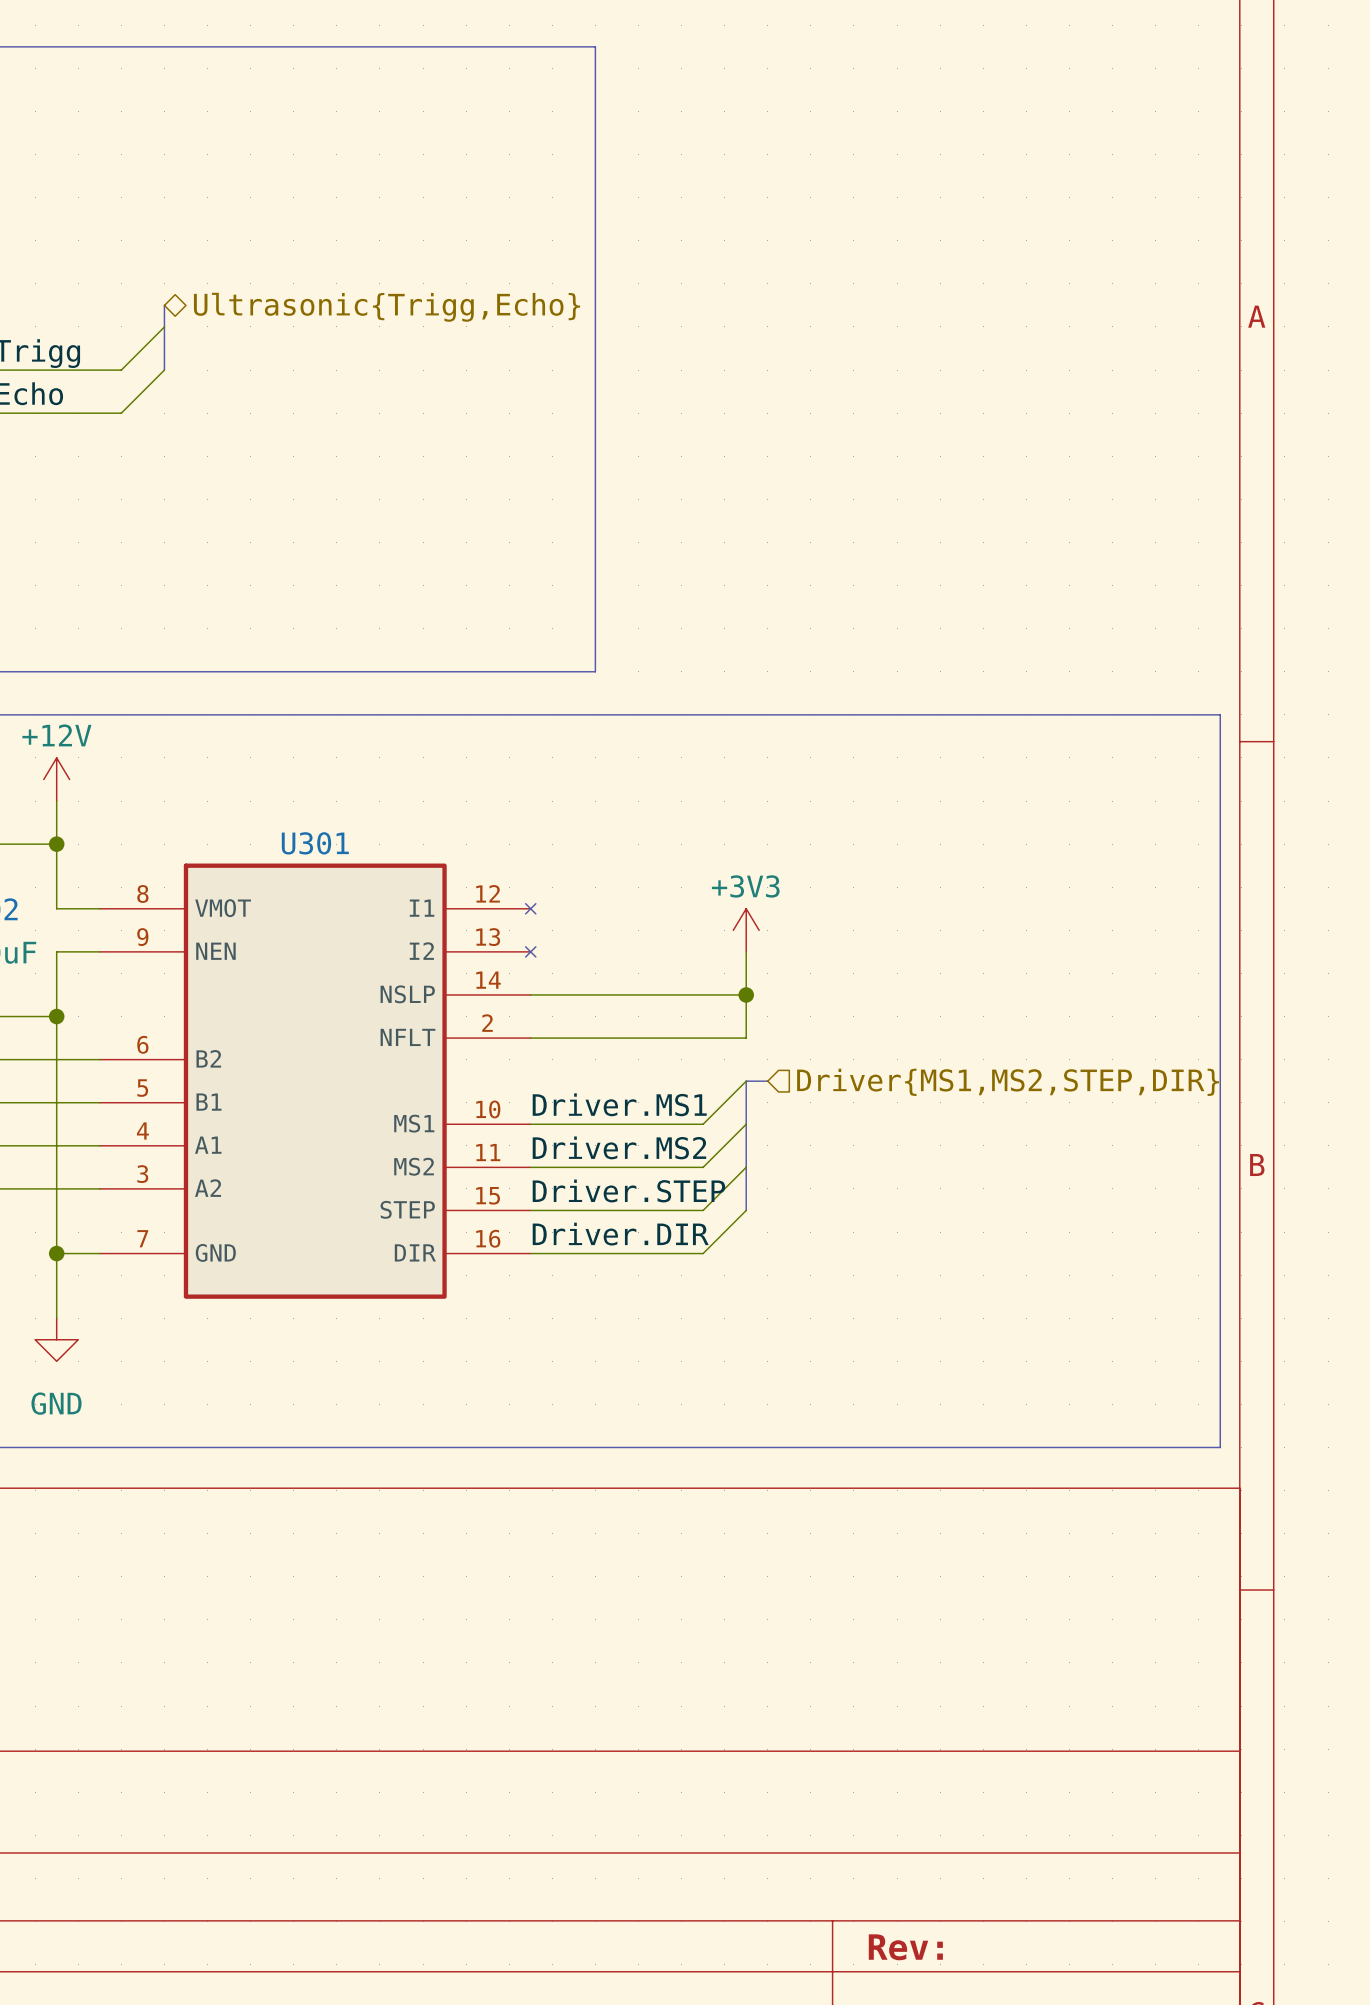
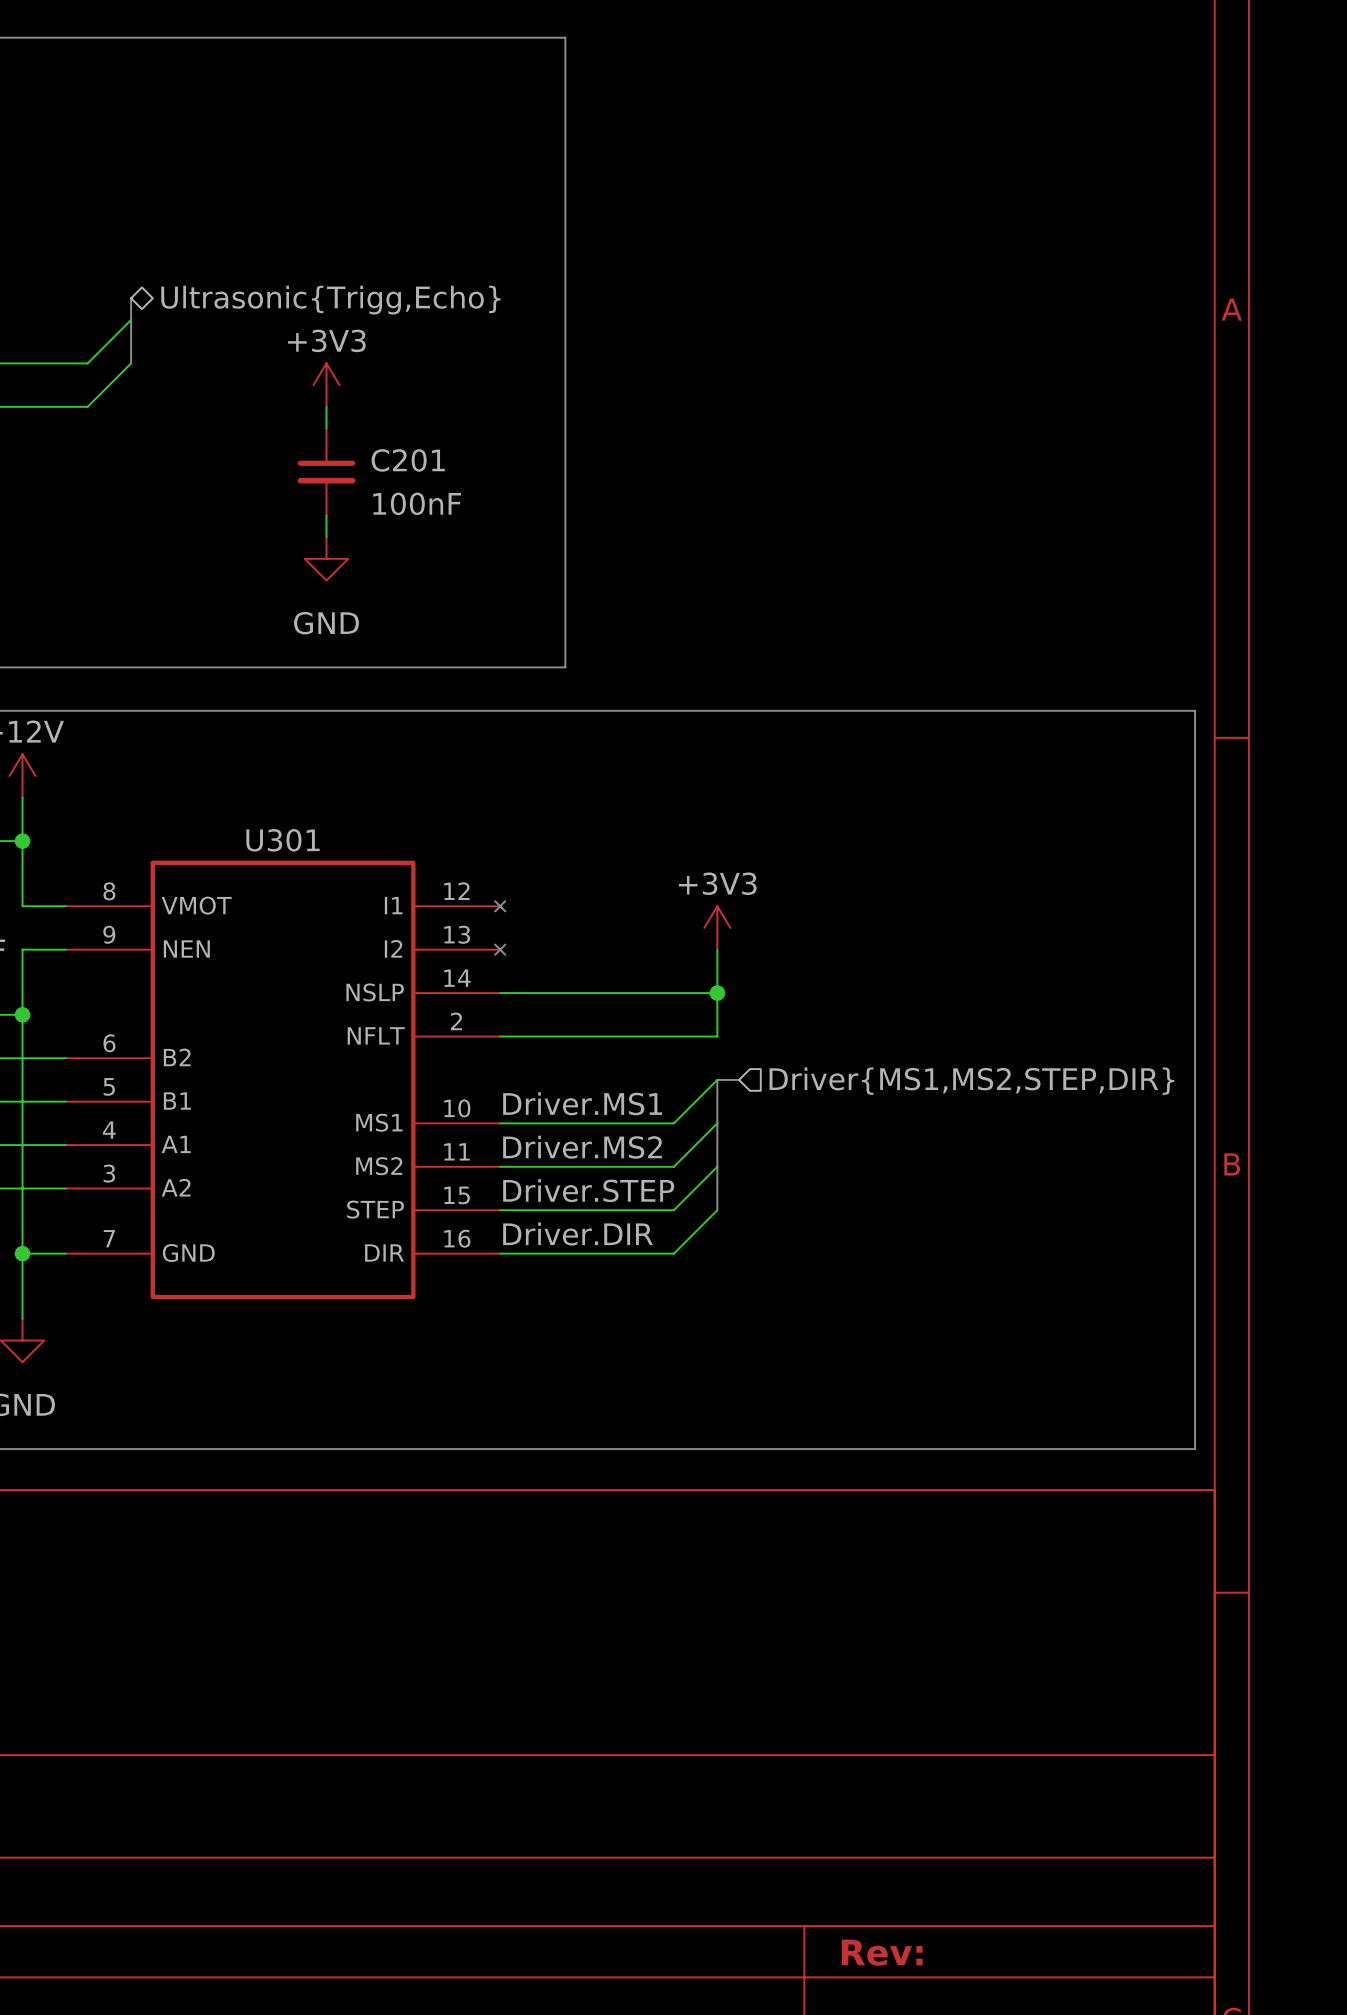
power symbol: none -> +3V3 (326, 385)
wire: none -> (326, 406) (326, 428)
C201: none -> 100nF (326, 471)
wire: none -> (326, 515) (326, 537)
power symbol: none -> GND (326, 558)

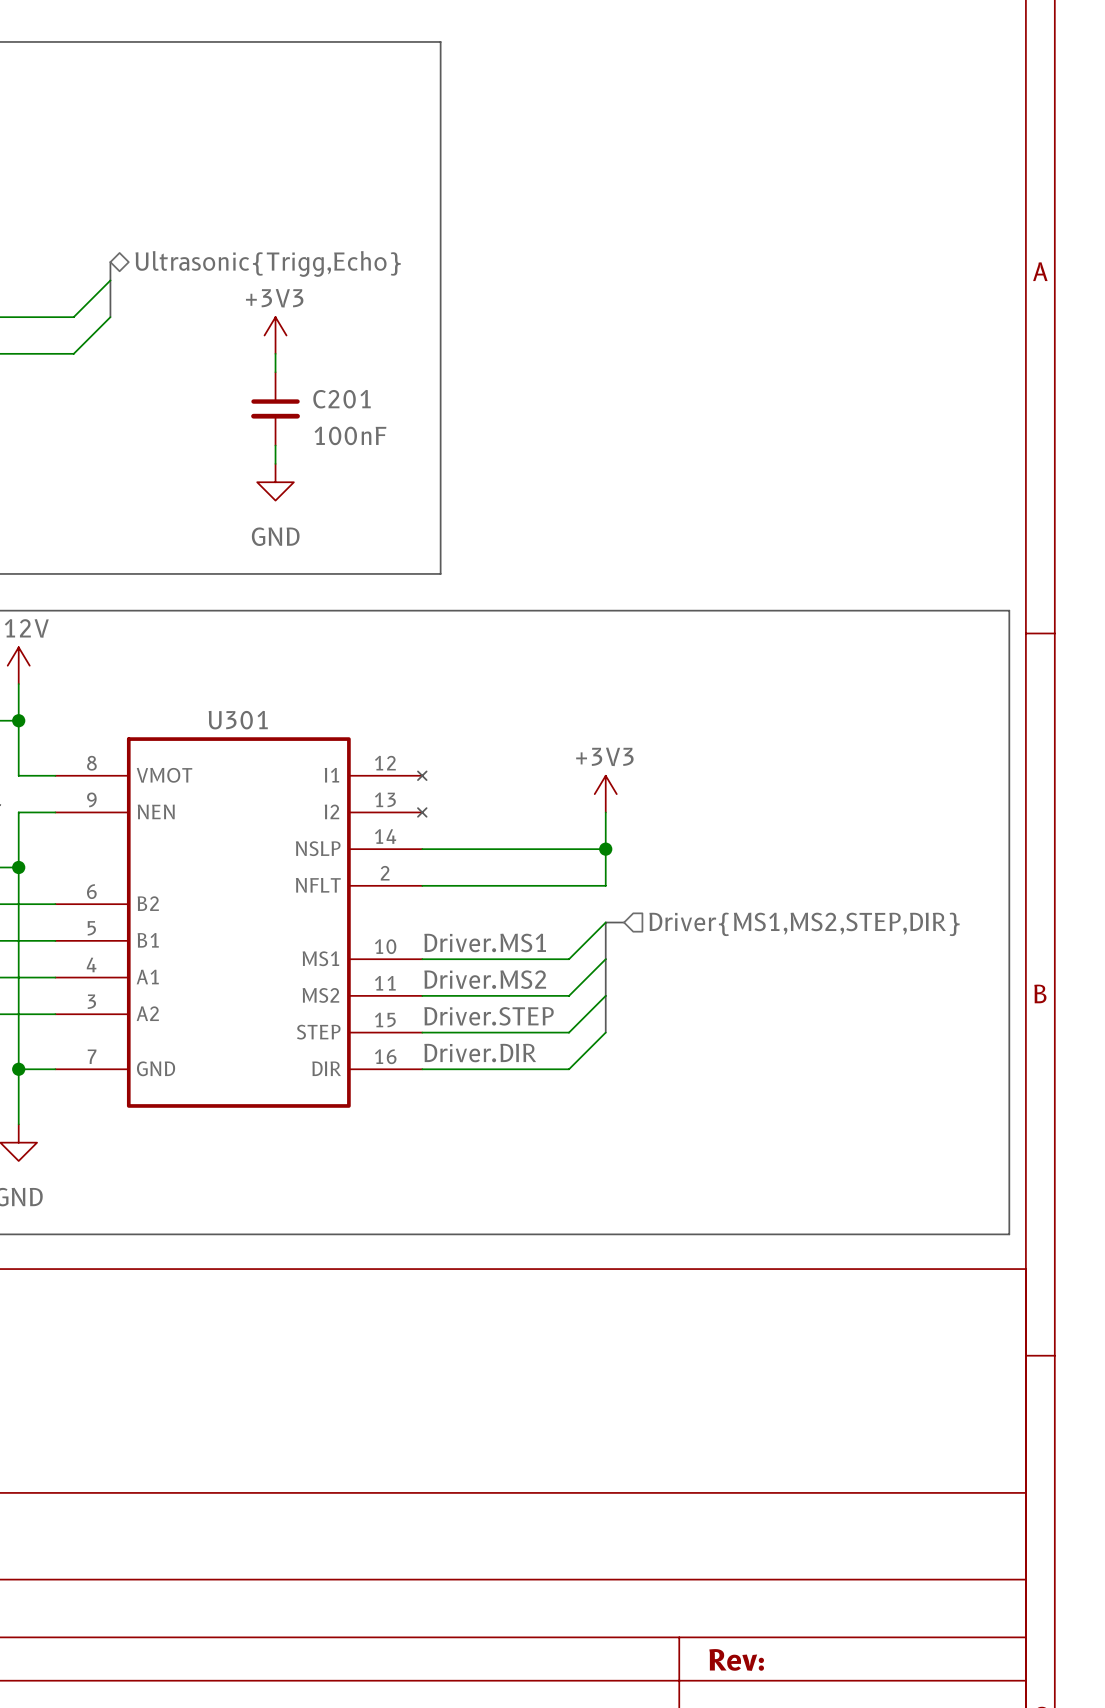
line: (521, 37) (565, 37) (565, 667) (521, 667) -> (440, 41) (440, 573)

